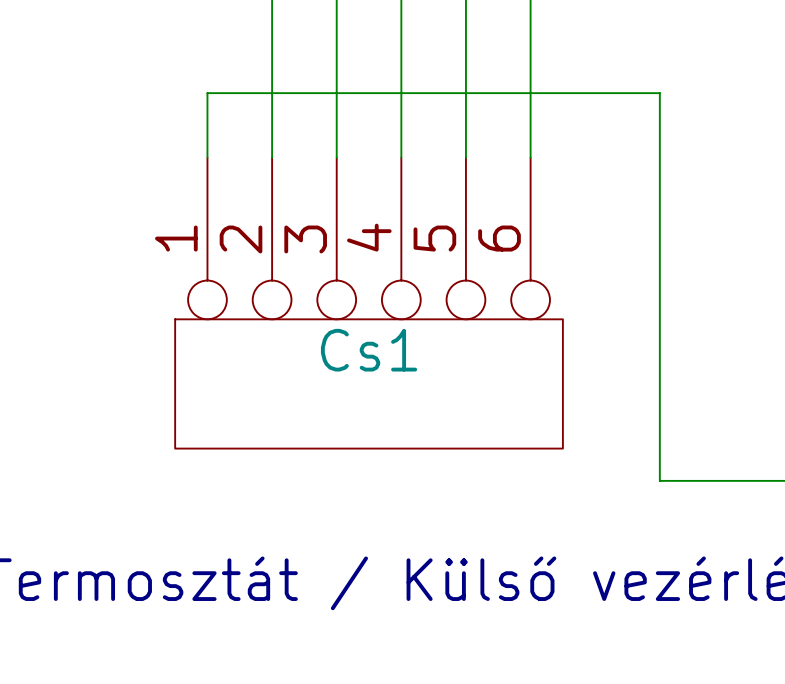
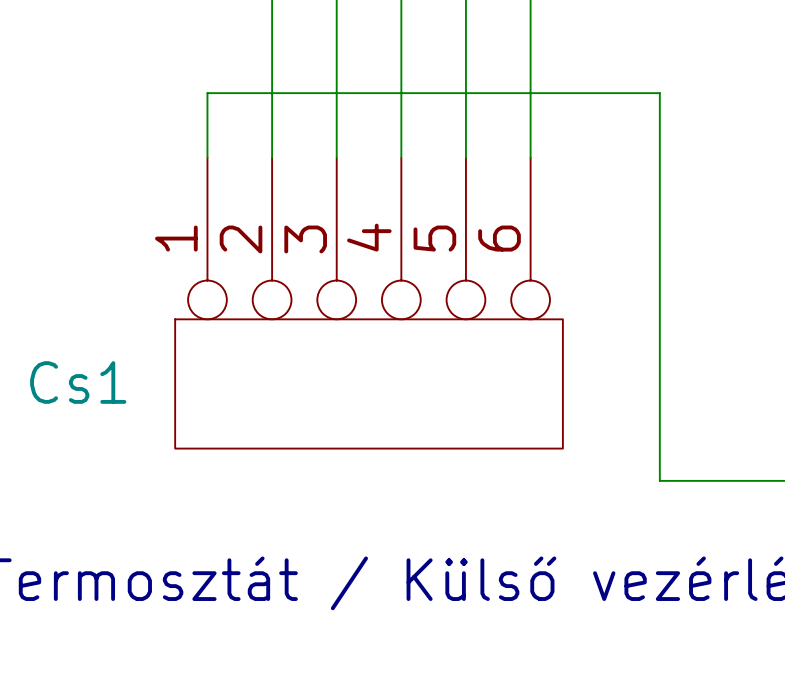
Cs1 name position: Cs1 (369, 350) -> Cs1 (78, 382)

